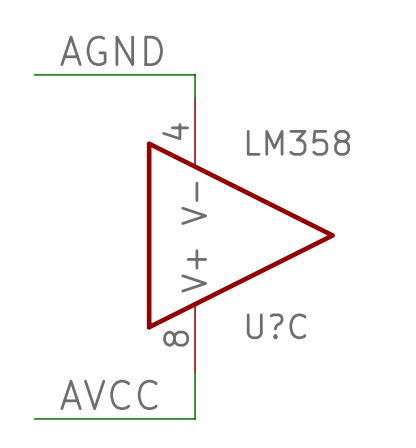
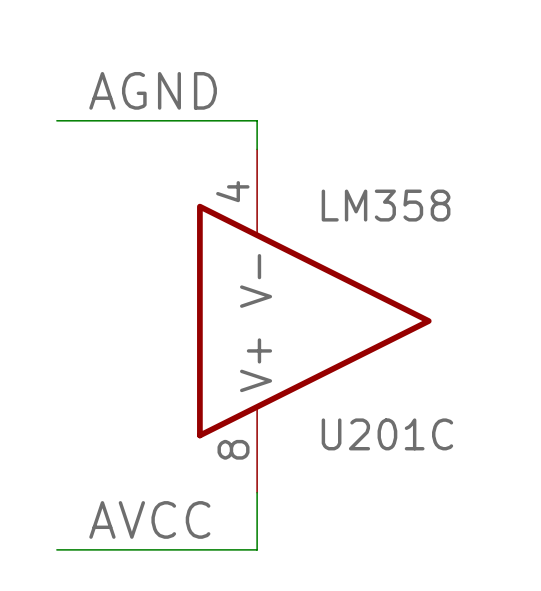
U?C name: U?C (276, 326) -> U201C (387, 434)

